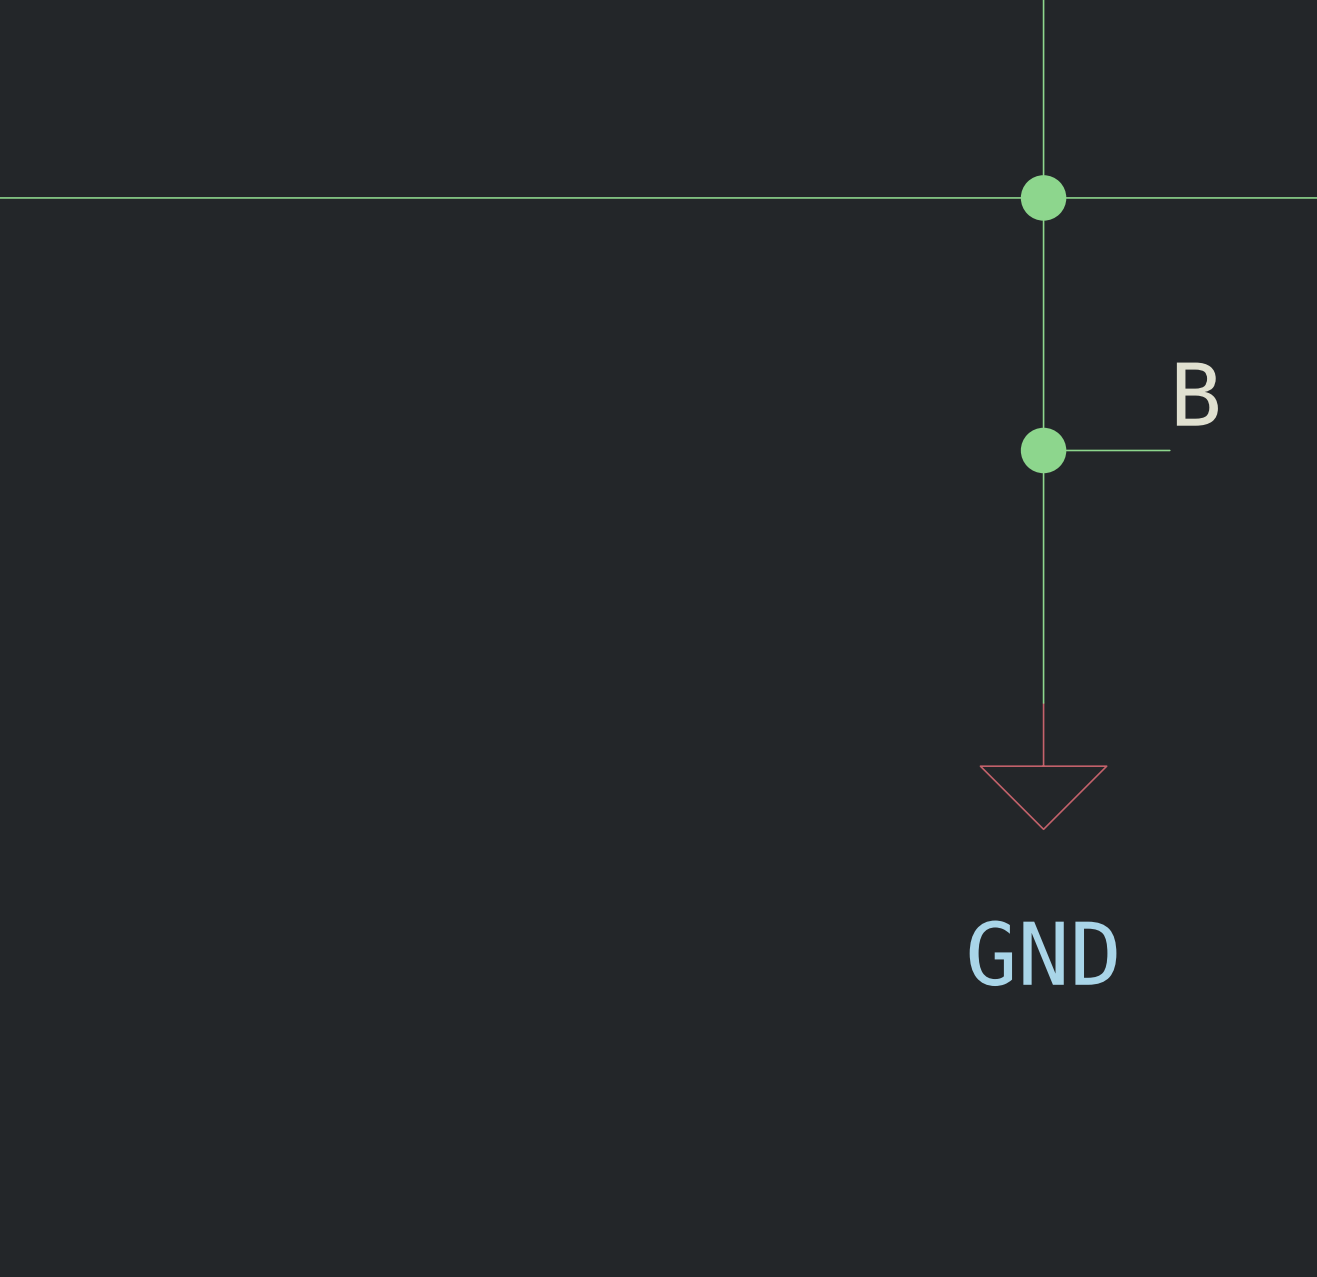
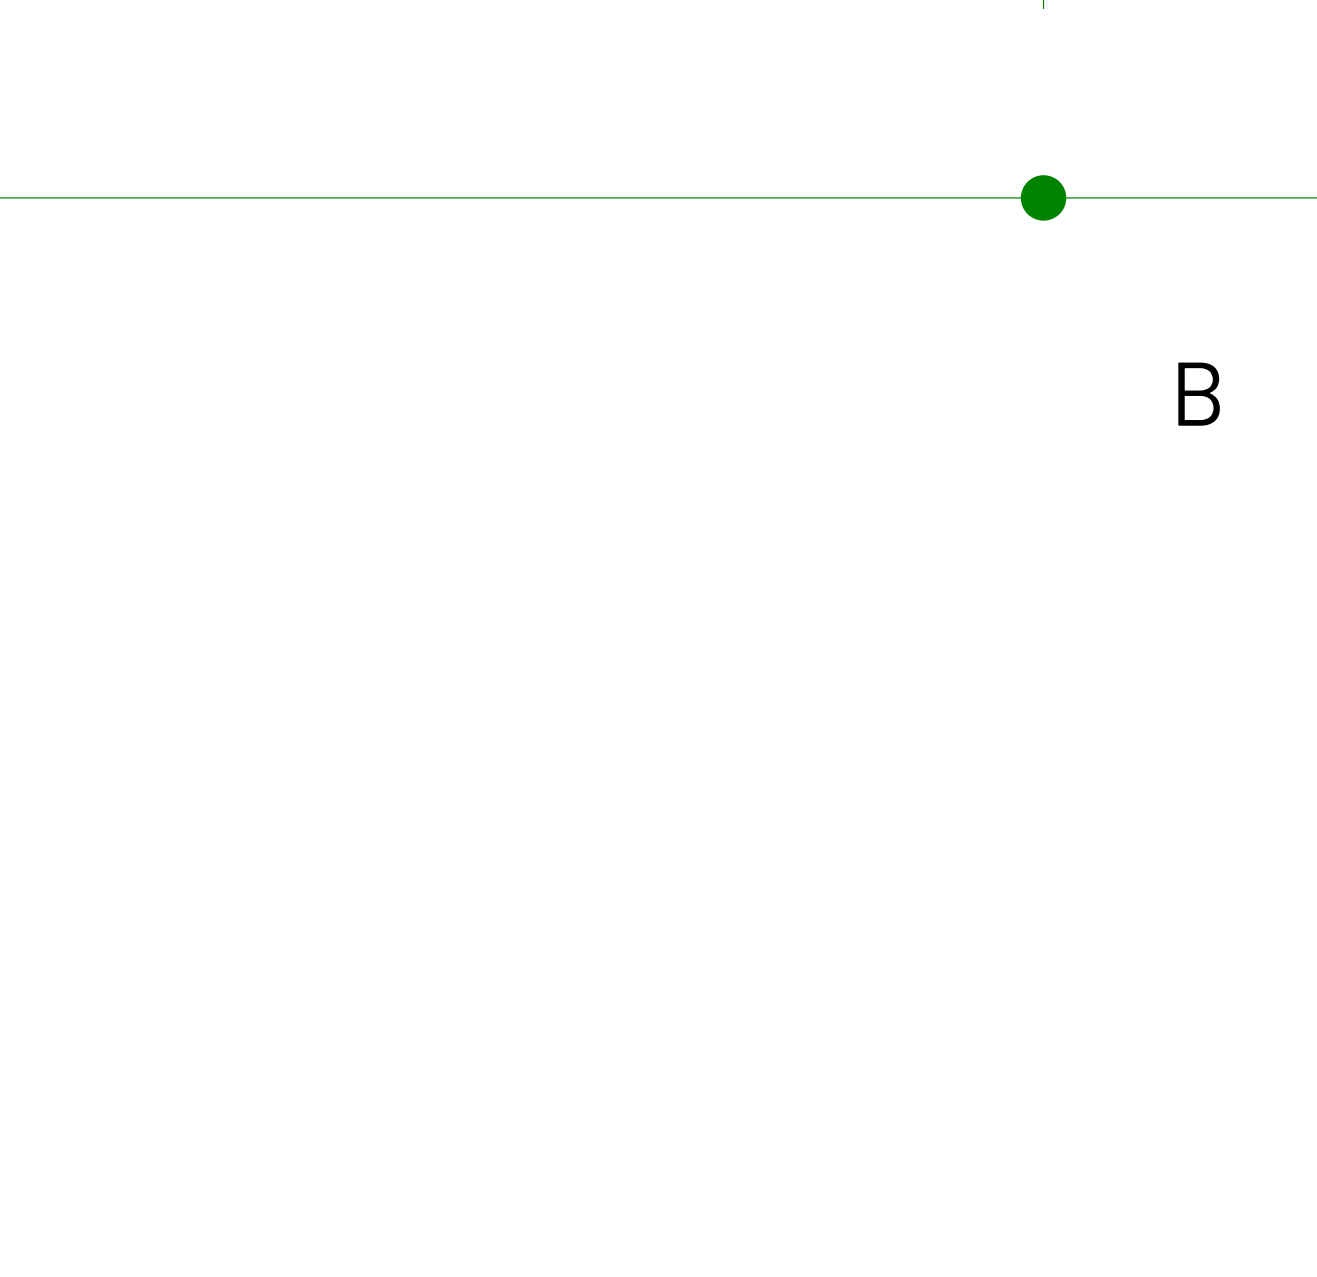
wire: (1043, 8) (1043, 703) -> none
wire: (1043, 450) (1169, 450) -> none
junction: (1043, 450) -> none
power symbol: GND (1043, 766) -> none

